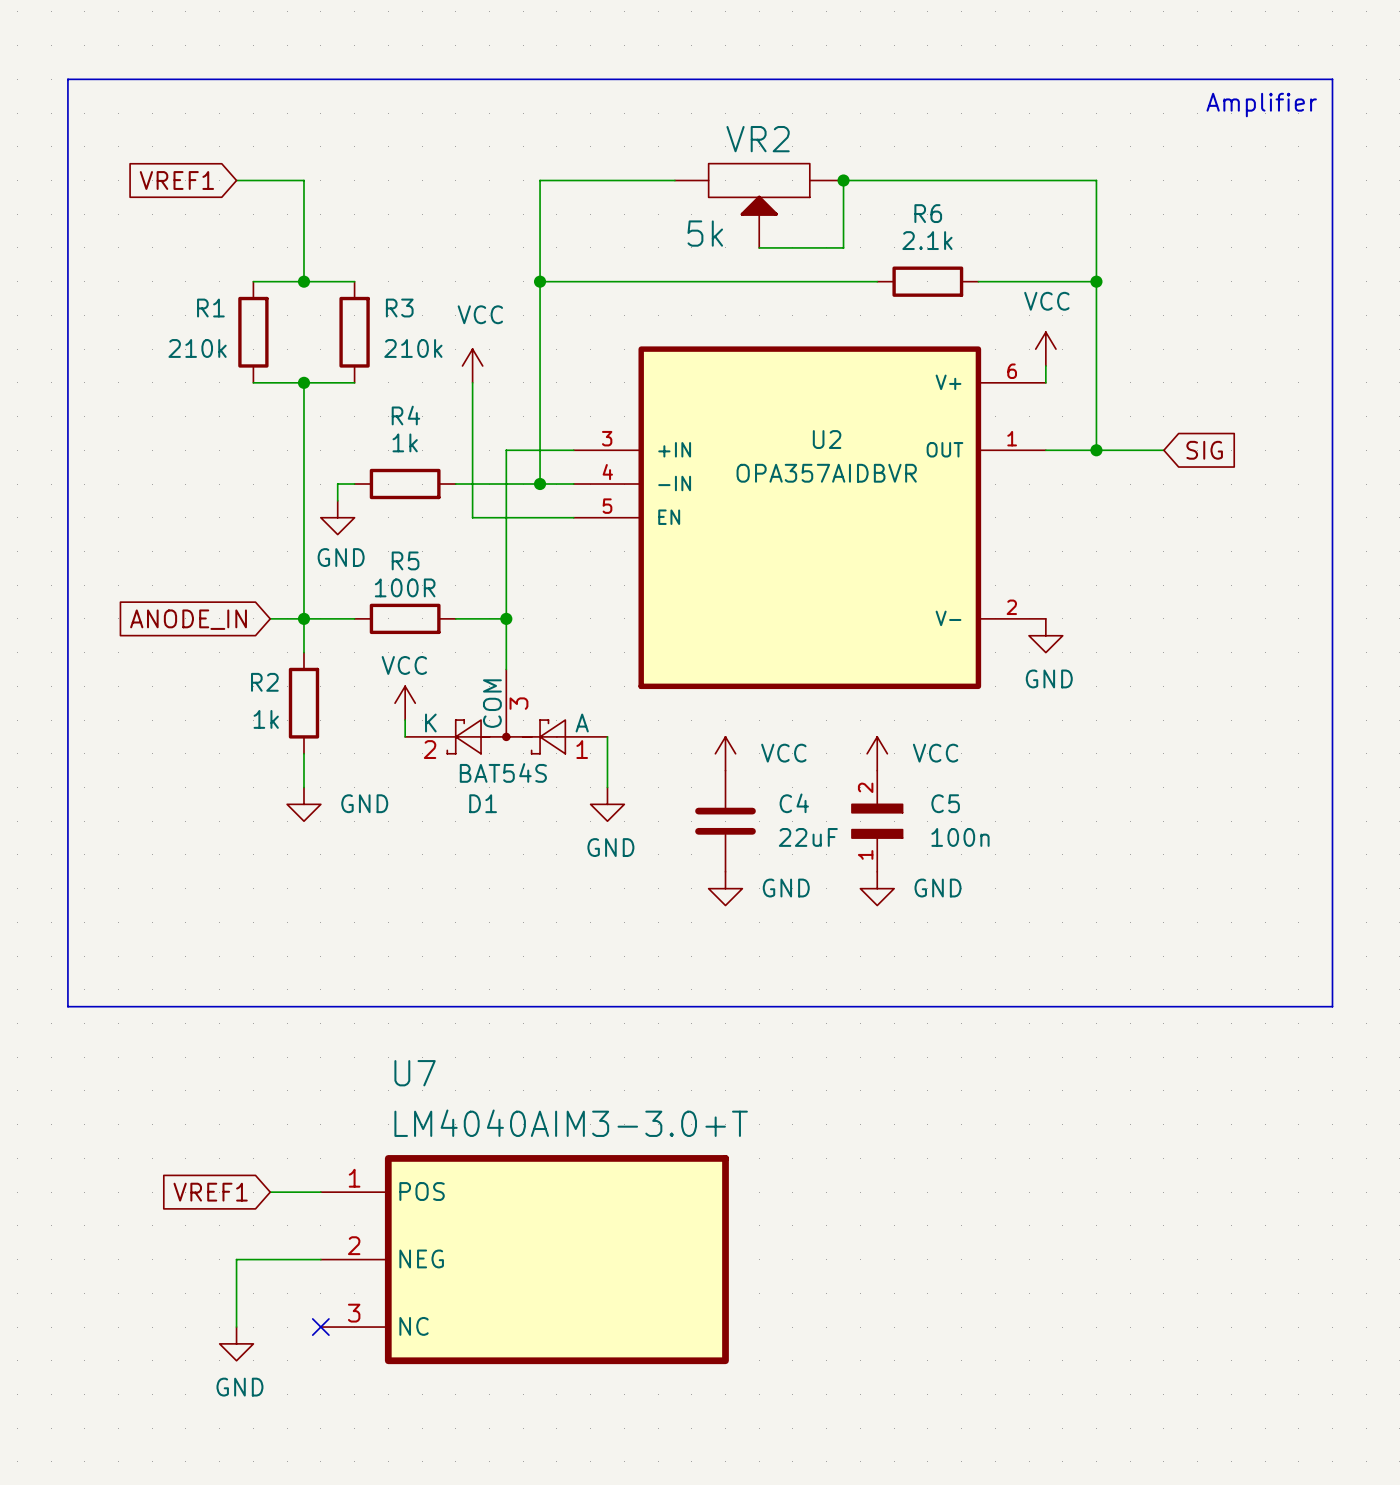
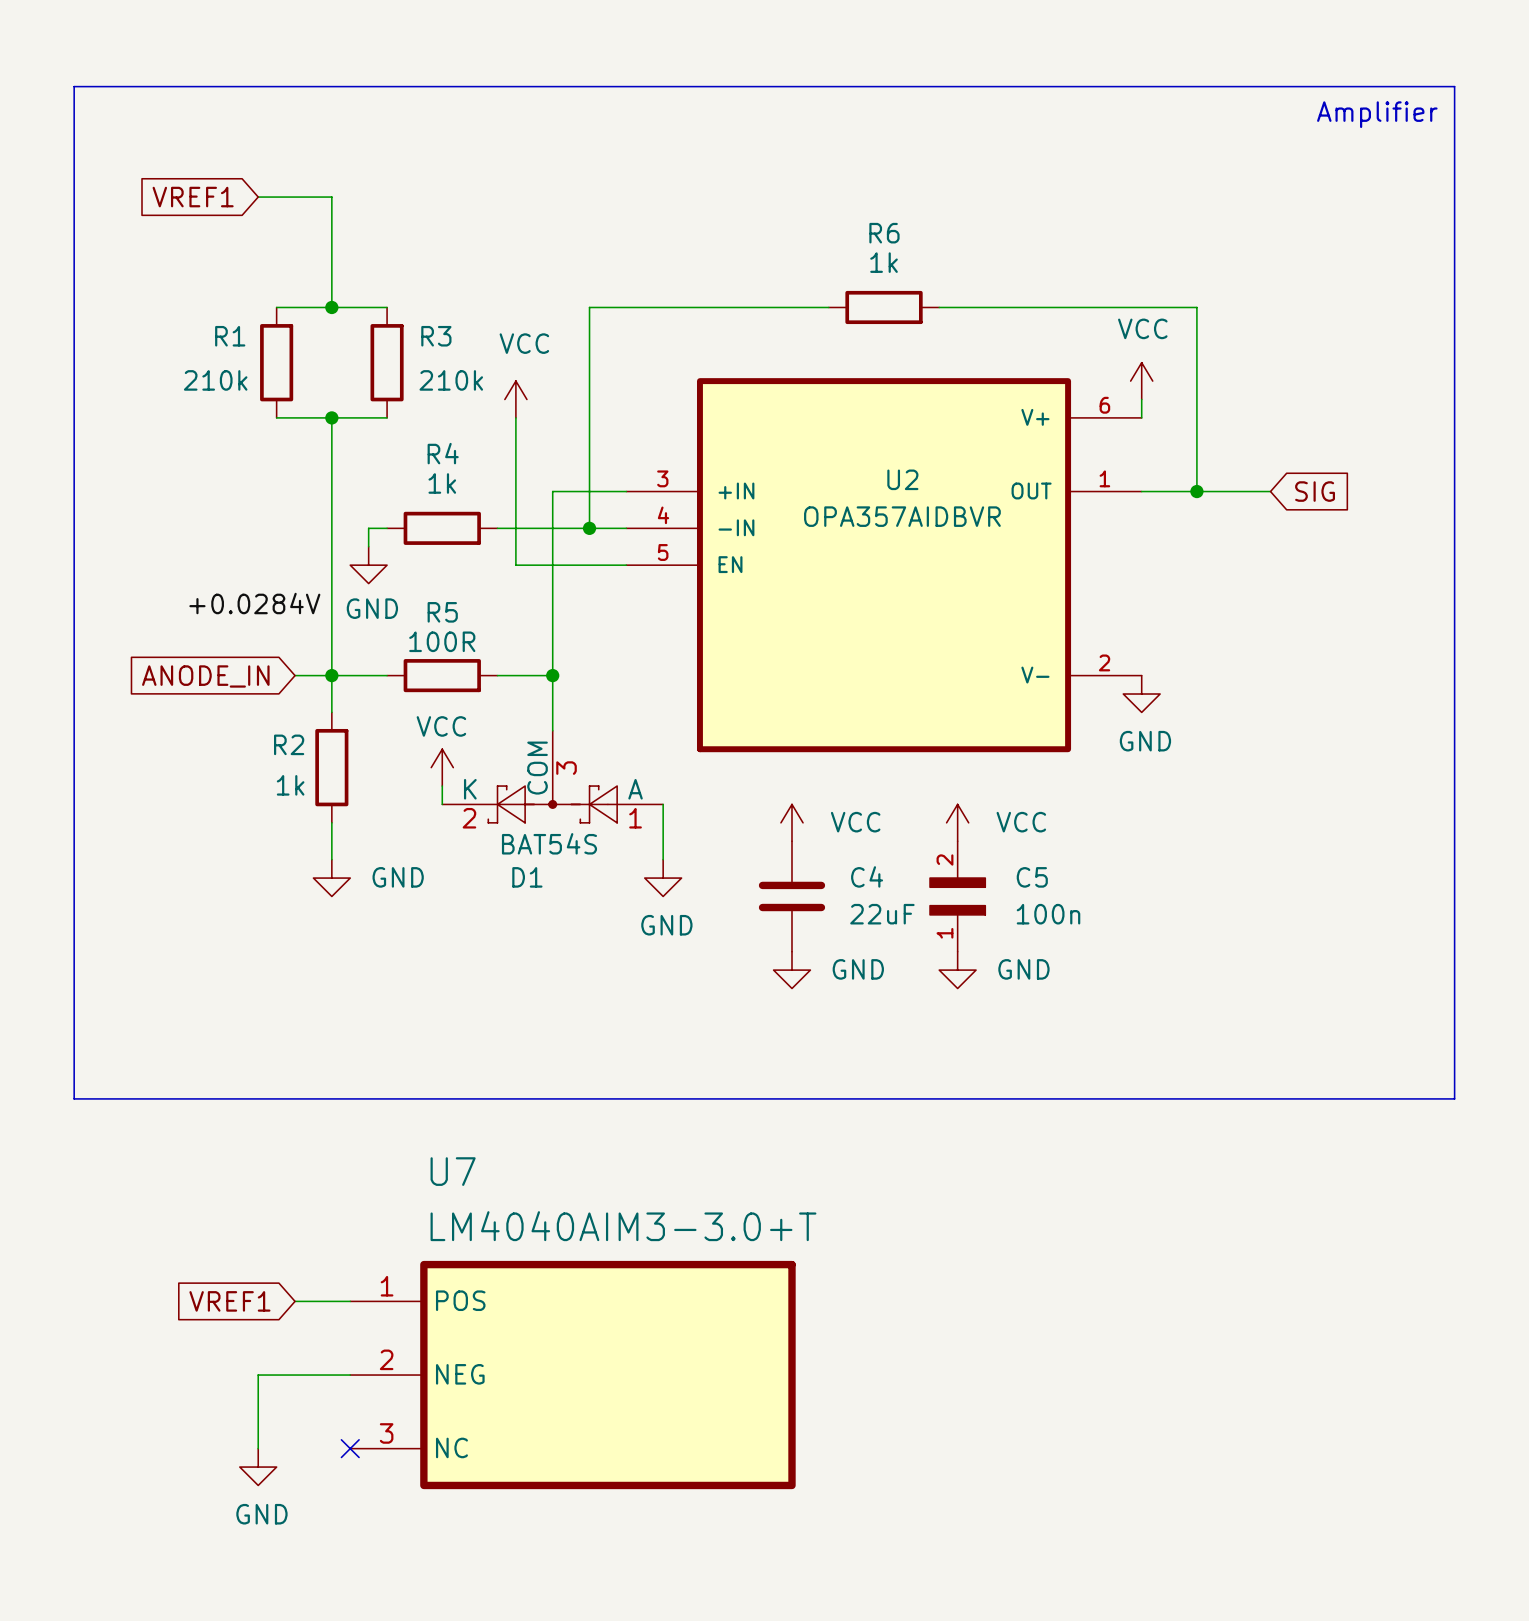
wire: (674, 180) (540, 180) (540, 281) -> none
junction: (843, 180) -> none
VR2: 5k (759, 205) -> none
R6 value: 2.1k (927, 240) -> 1k (884, 262)
wire: (759, 247) (843, 247) (843, 180) (1096, 180) (1096, 281) -> none
junction: (540, 281) -> none
wire: (759, 281) (860, 281) -> (957, 307) (1068, 307)
R6 position: (927, 281) -> (884, 307)
junction: (1096, 281) -> none
label: none -> +0.0284V (254, 603)

